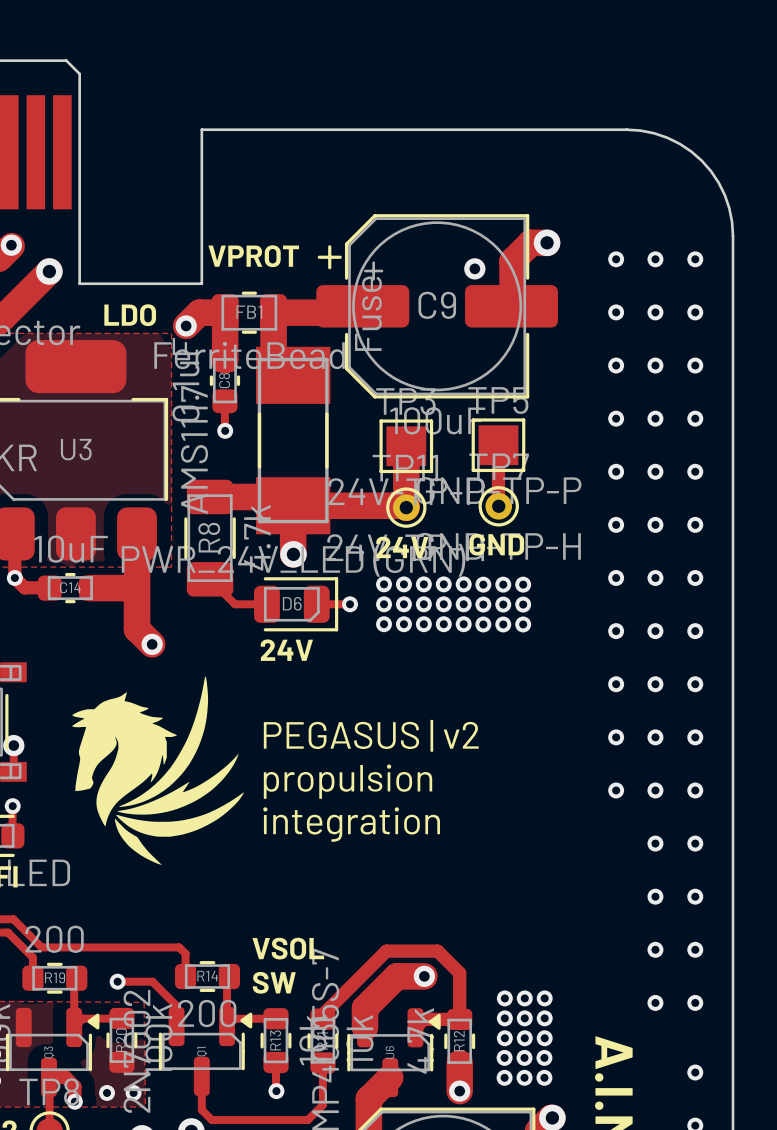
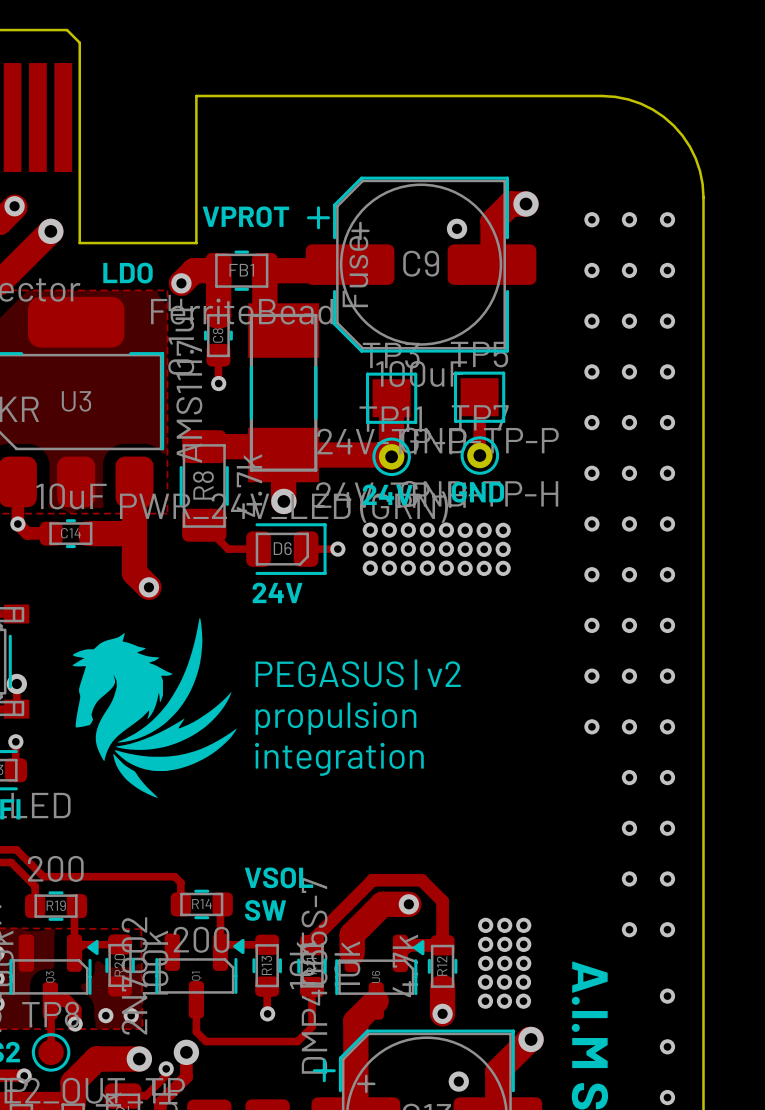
track: (117, 981) (152, 981) (176, 1005) (176, 1026) -> none
via: (117, 981) -> none

